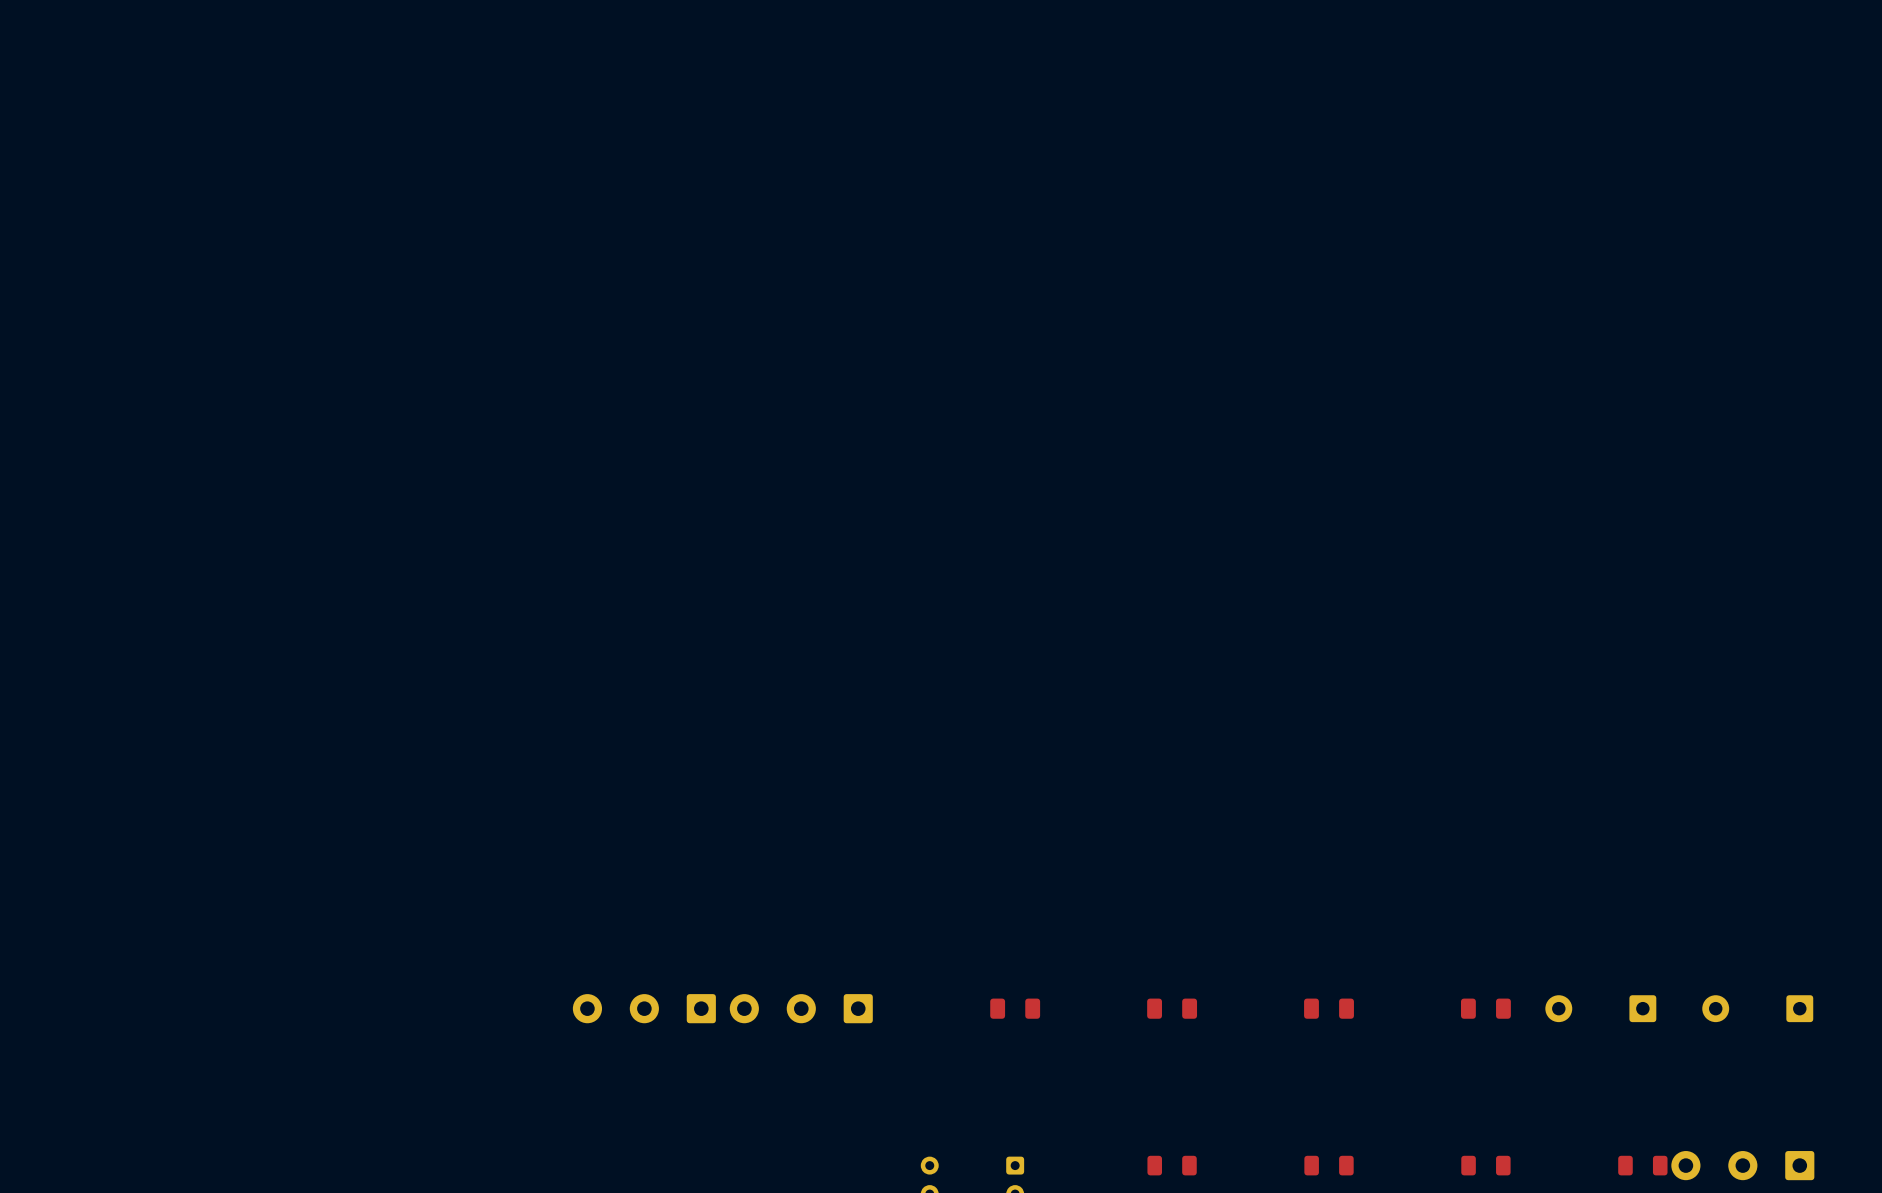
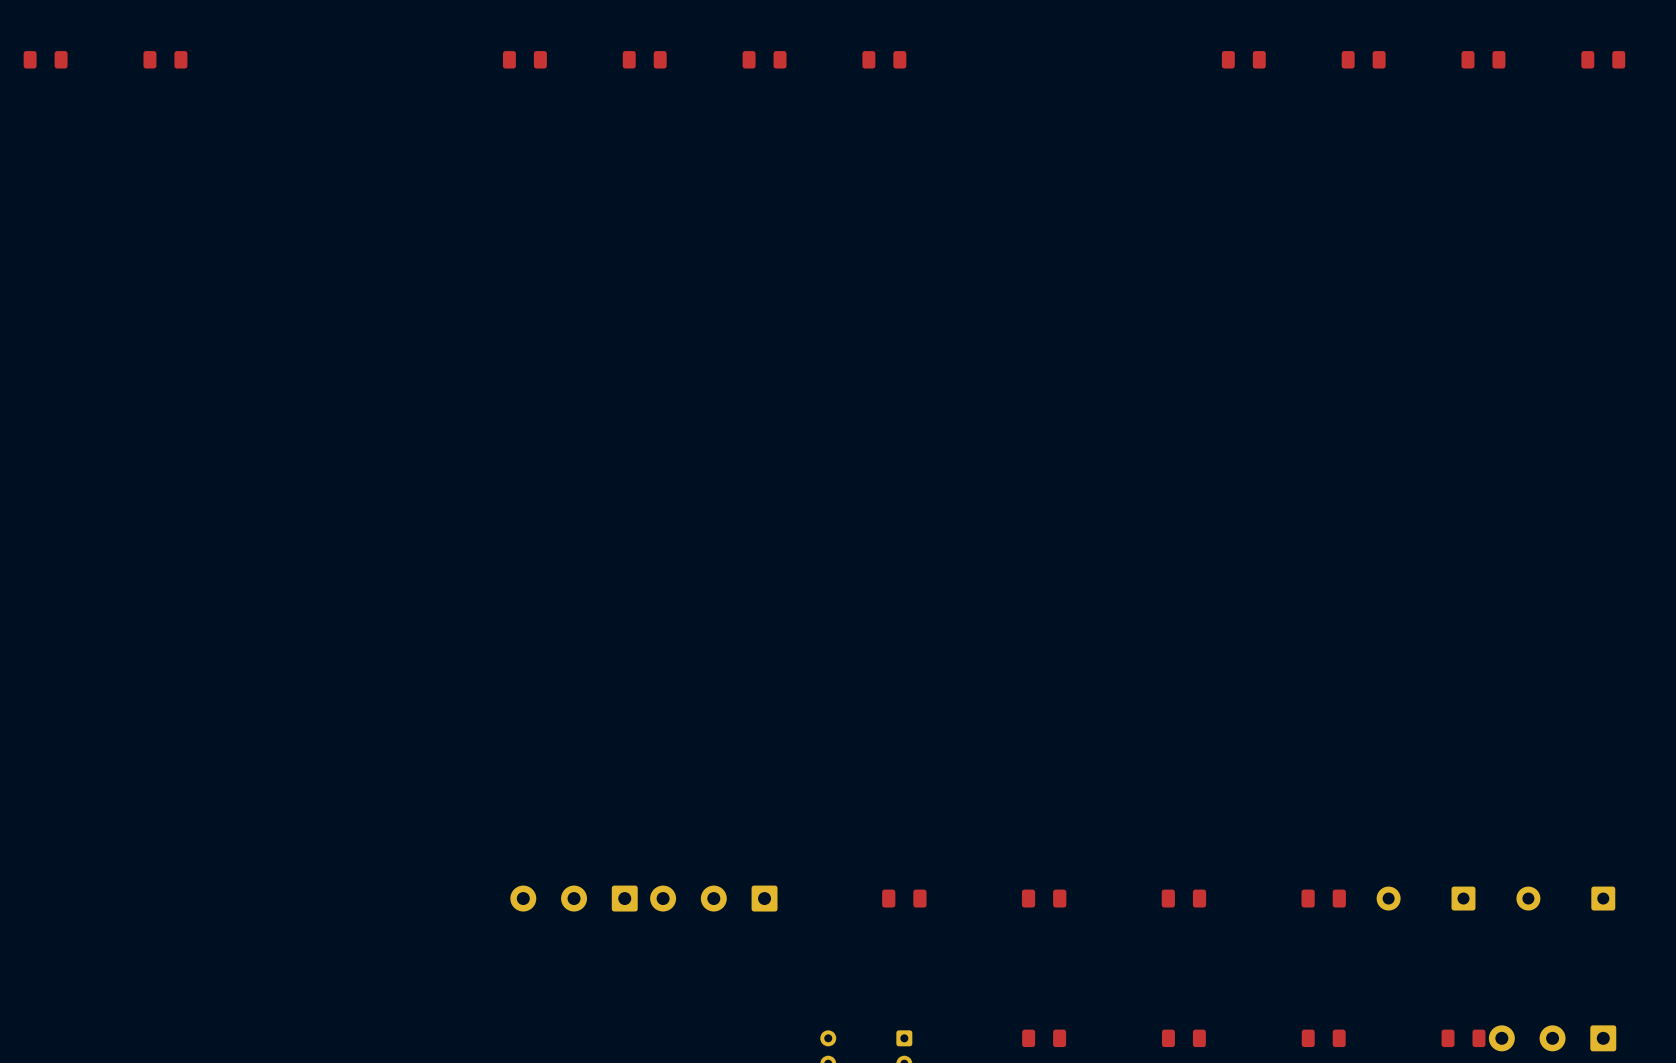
part: none -> (45, 59)
part: none -> (165, 59)
part: none -> (524, 59)
part: none -> (644, 59)
part: none -> (764, 59)
part: none -> (884, 59)
part: none -> (1243, 59)
part: none -> (1363, 59)
part: none -> (1483, 59)
part: none -> (1603, 59)

